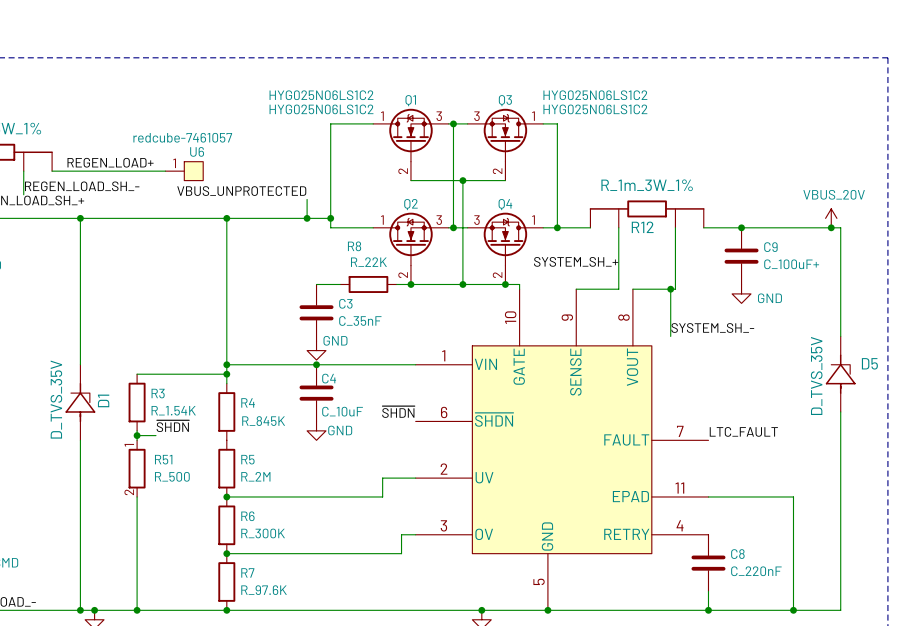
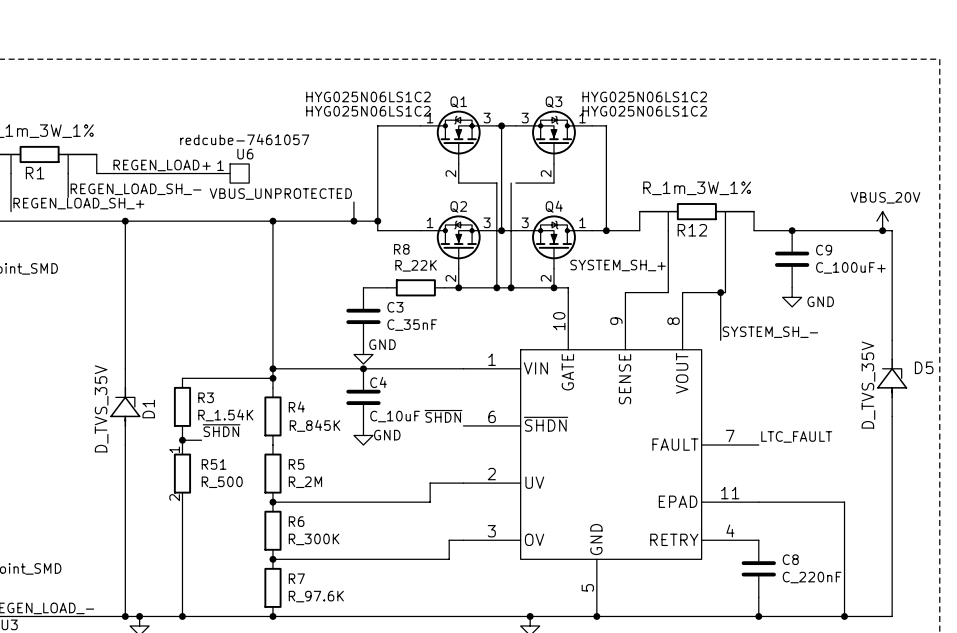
wire: (448, 180) (467, 180) -> (496, 183) (496, 287)
junction: (462, 180) -> none
junction: none -> (496, 287)

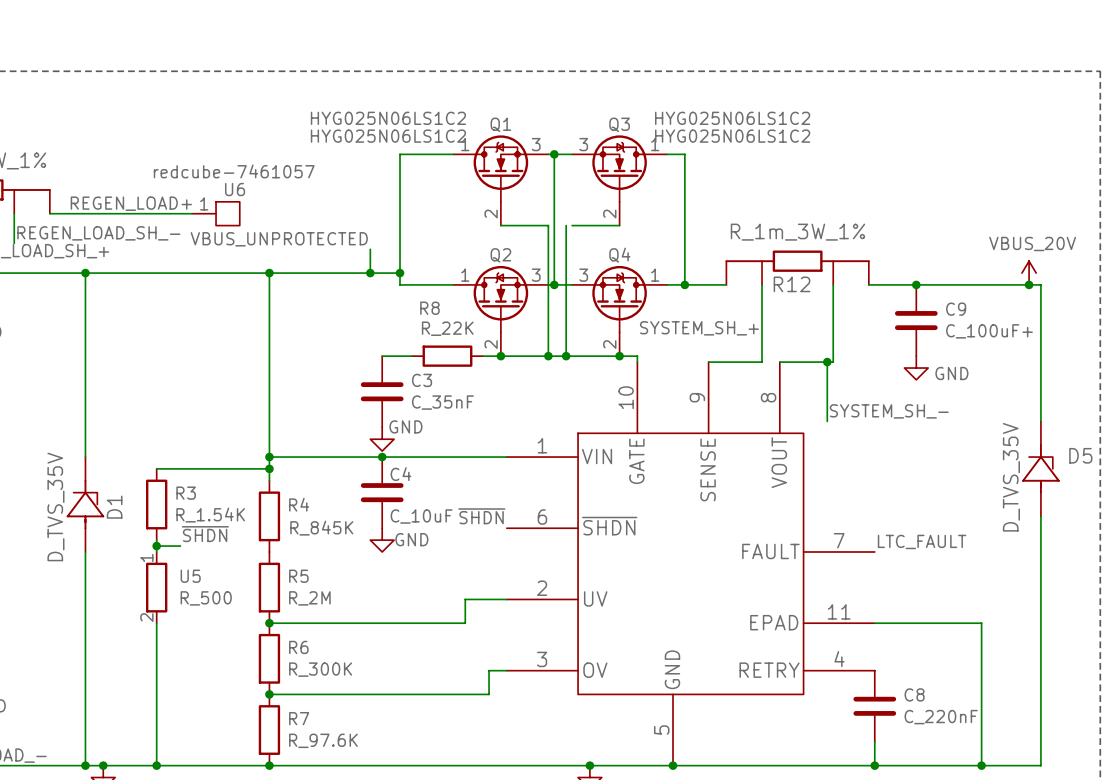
R51 name: R51 (214, 464) -> U5 (190, 576)

